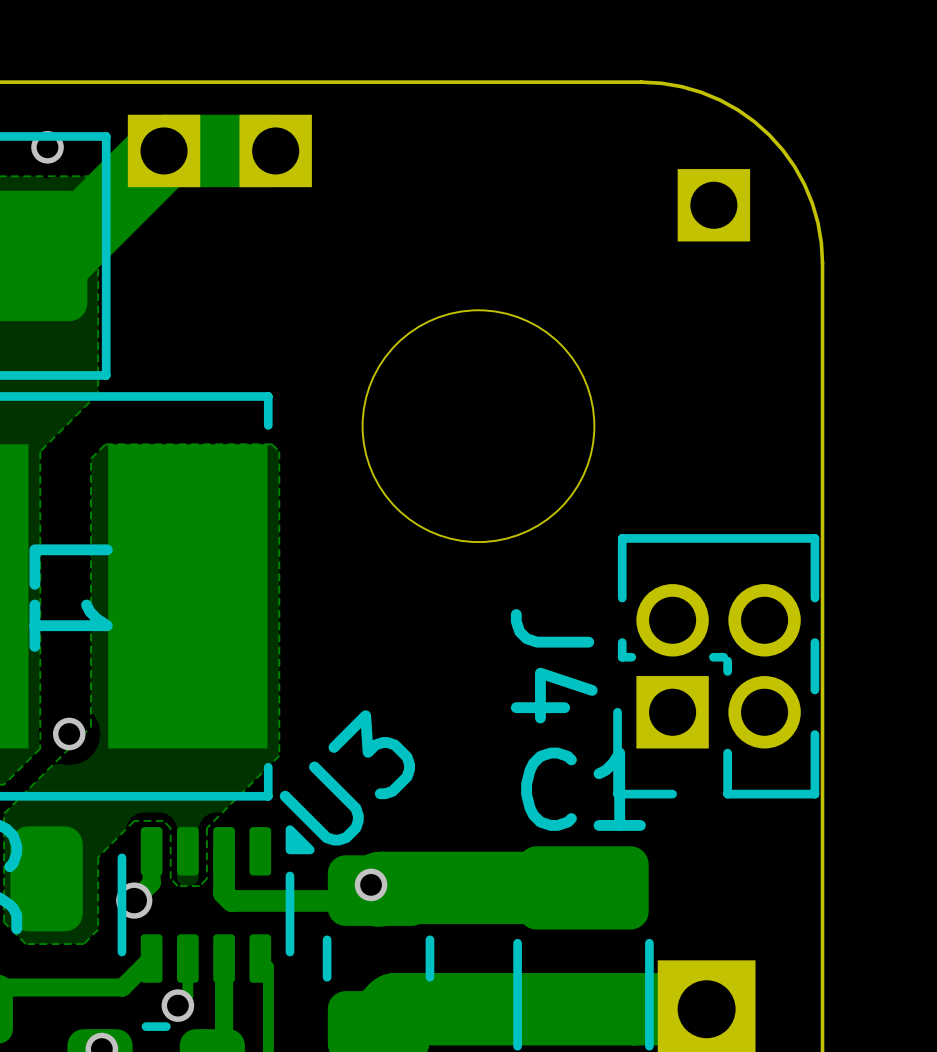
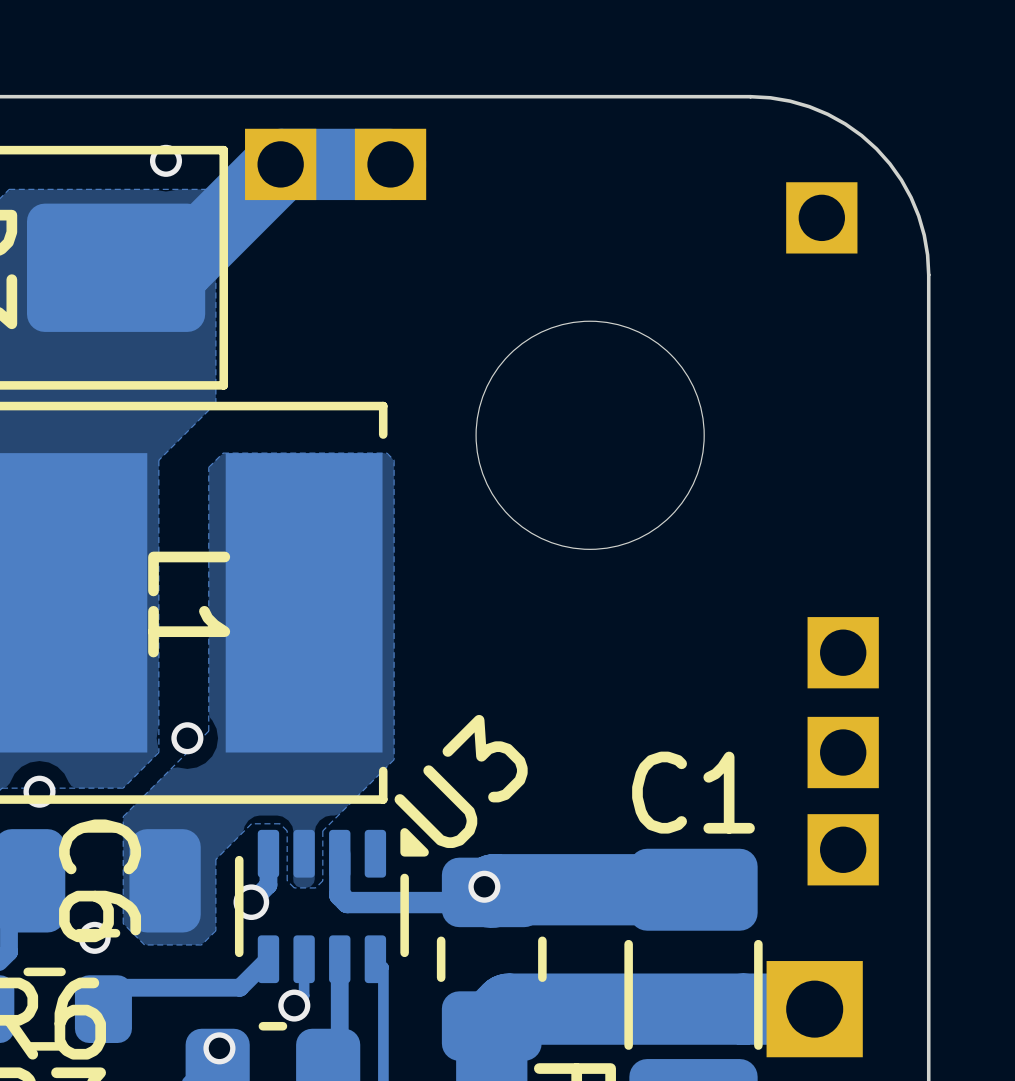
part: none -> (843, 652)
J4: (716, 666) -> none
part: none -> (843, 752)
part: none -> (843, 849)

